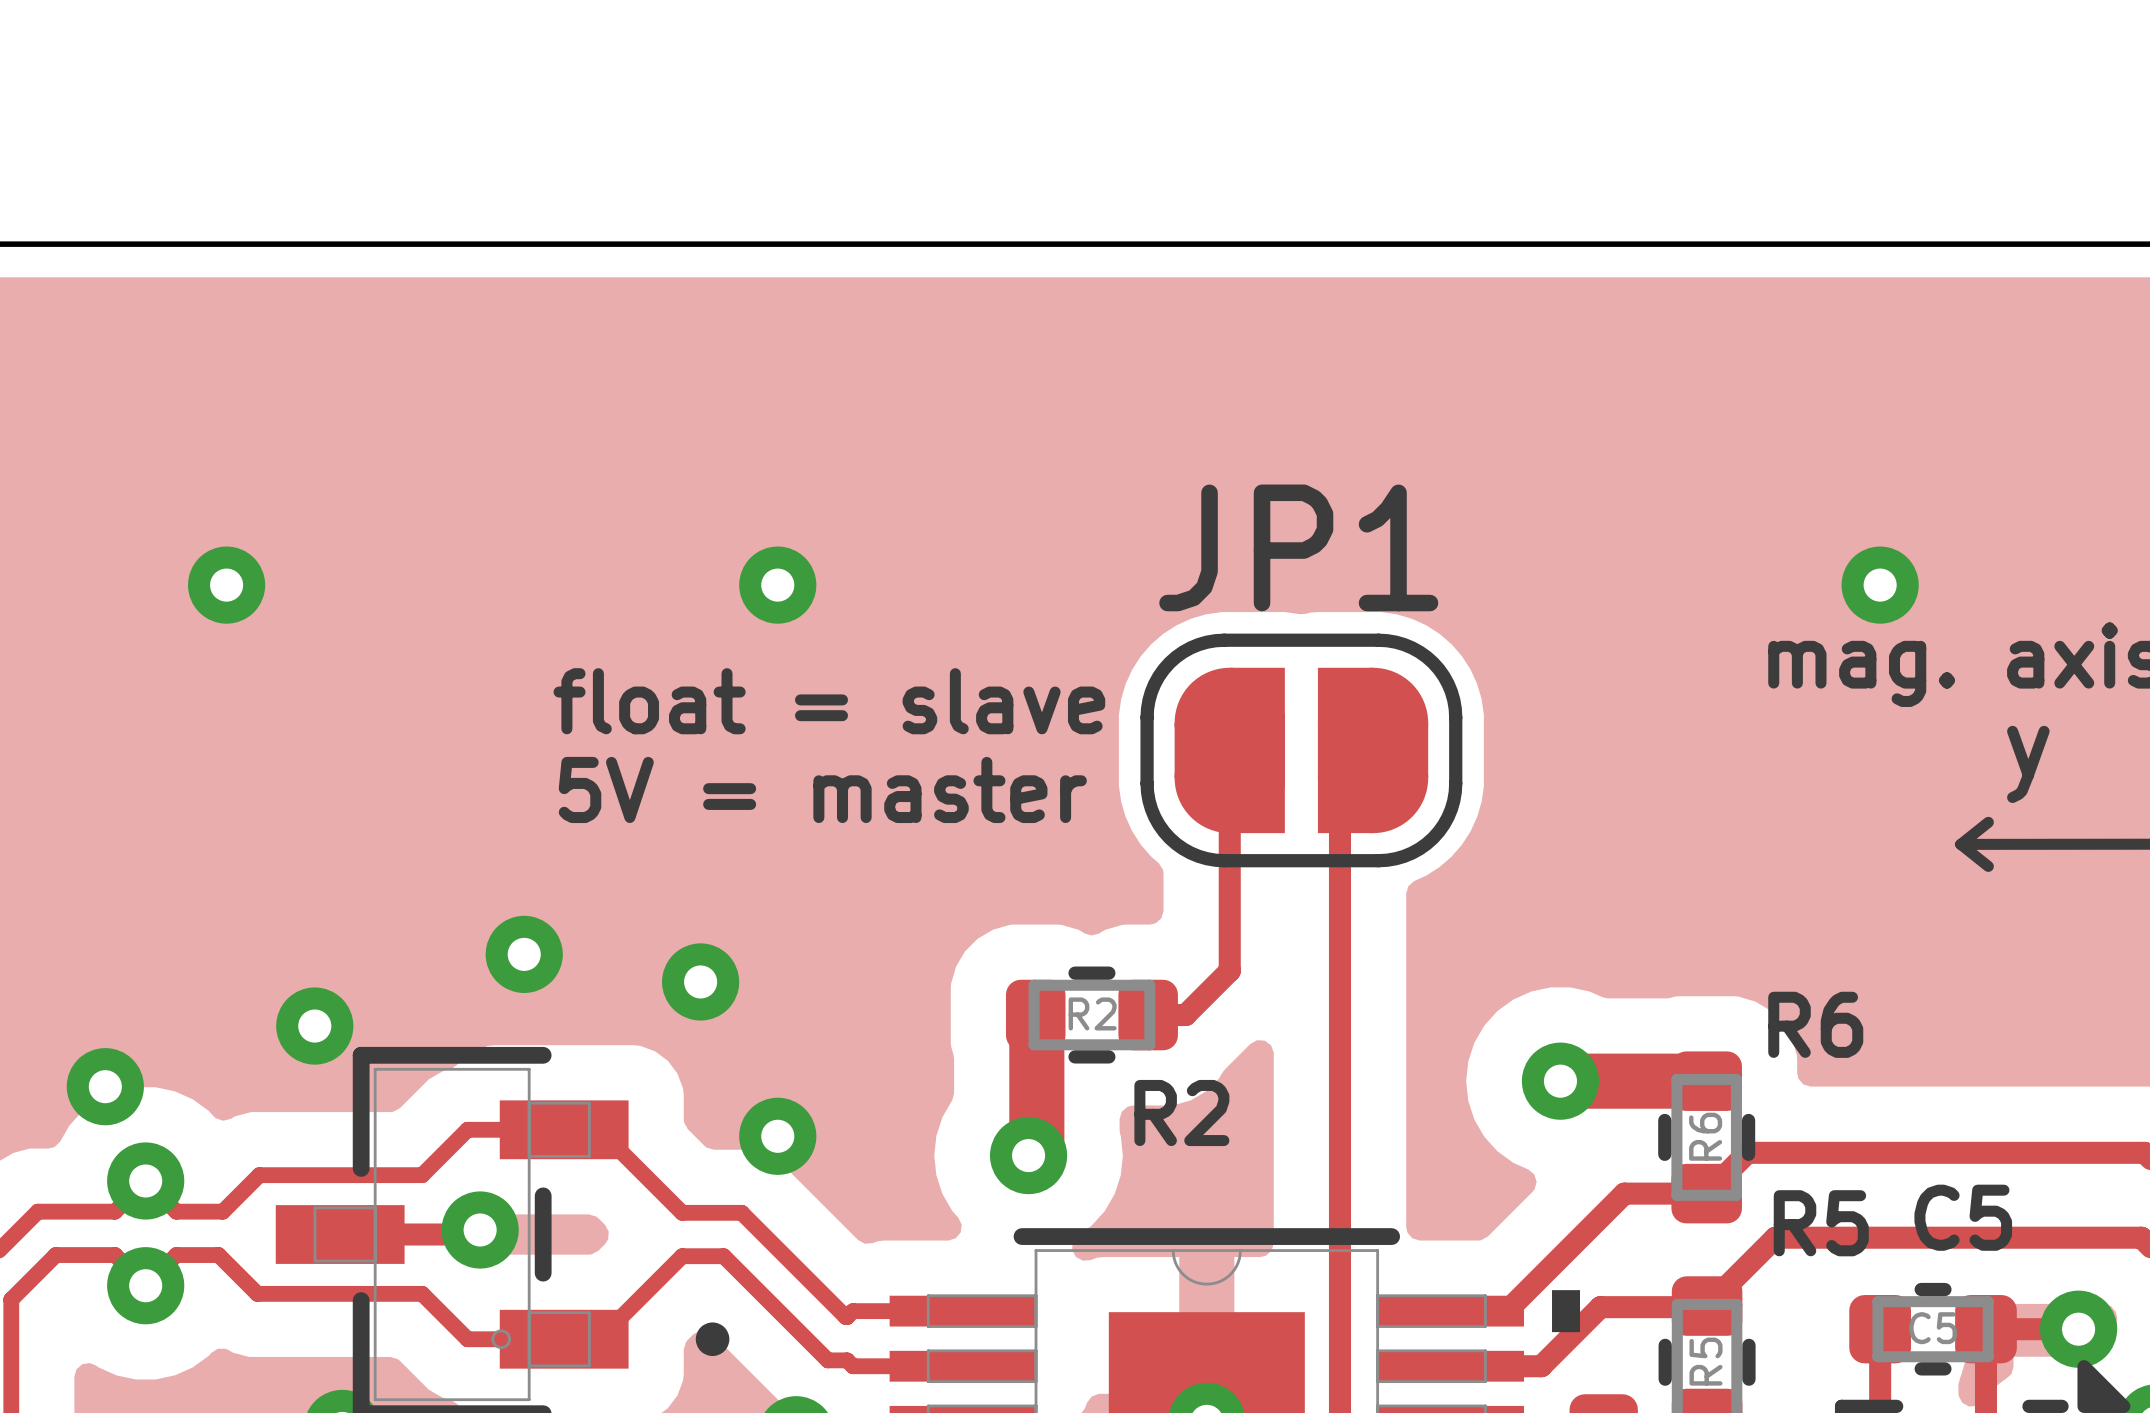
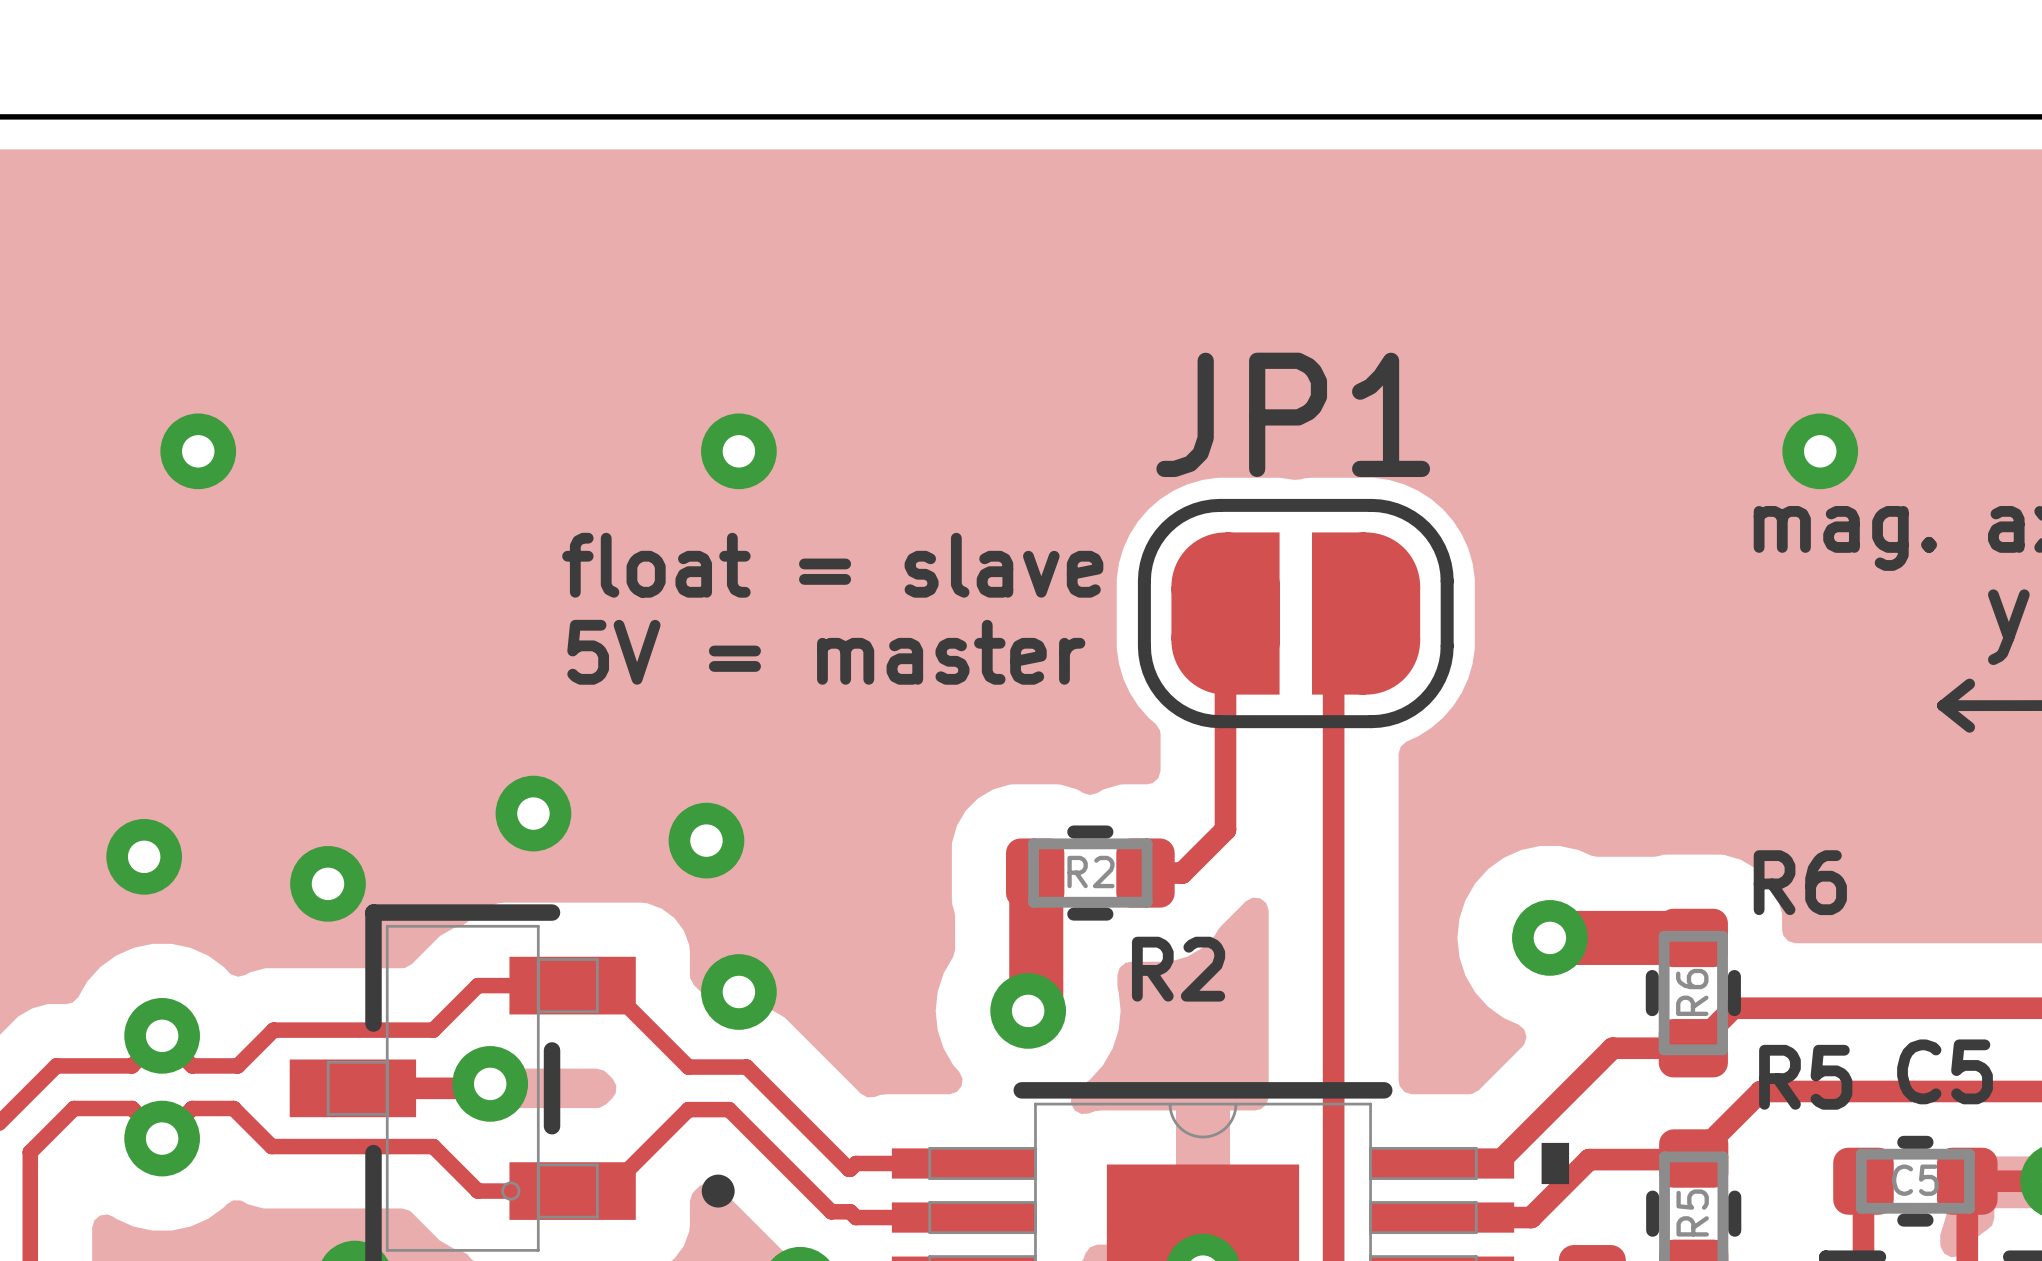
via position: (226, 585) -> (198, 451)
via position: (777, 585) -> (738, 451)
via position: (1880, 585) -> (1820, 451)
via position: (105, 1086) -> (144, 856)
via position: (777, 1136) -> (738, 991)

